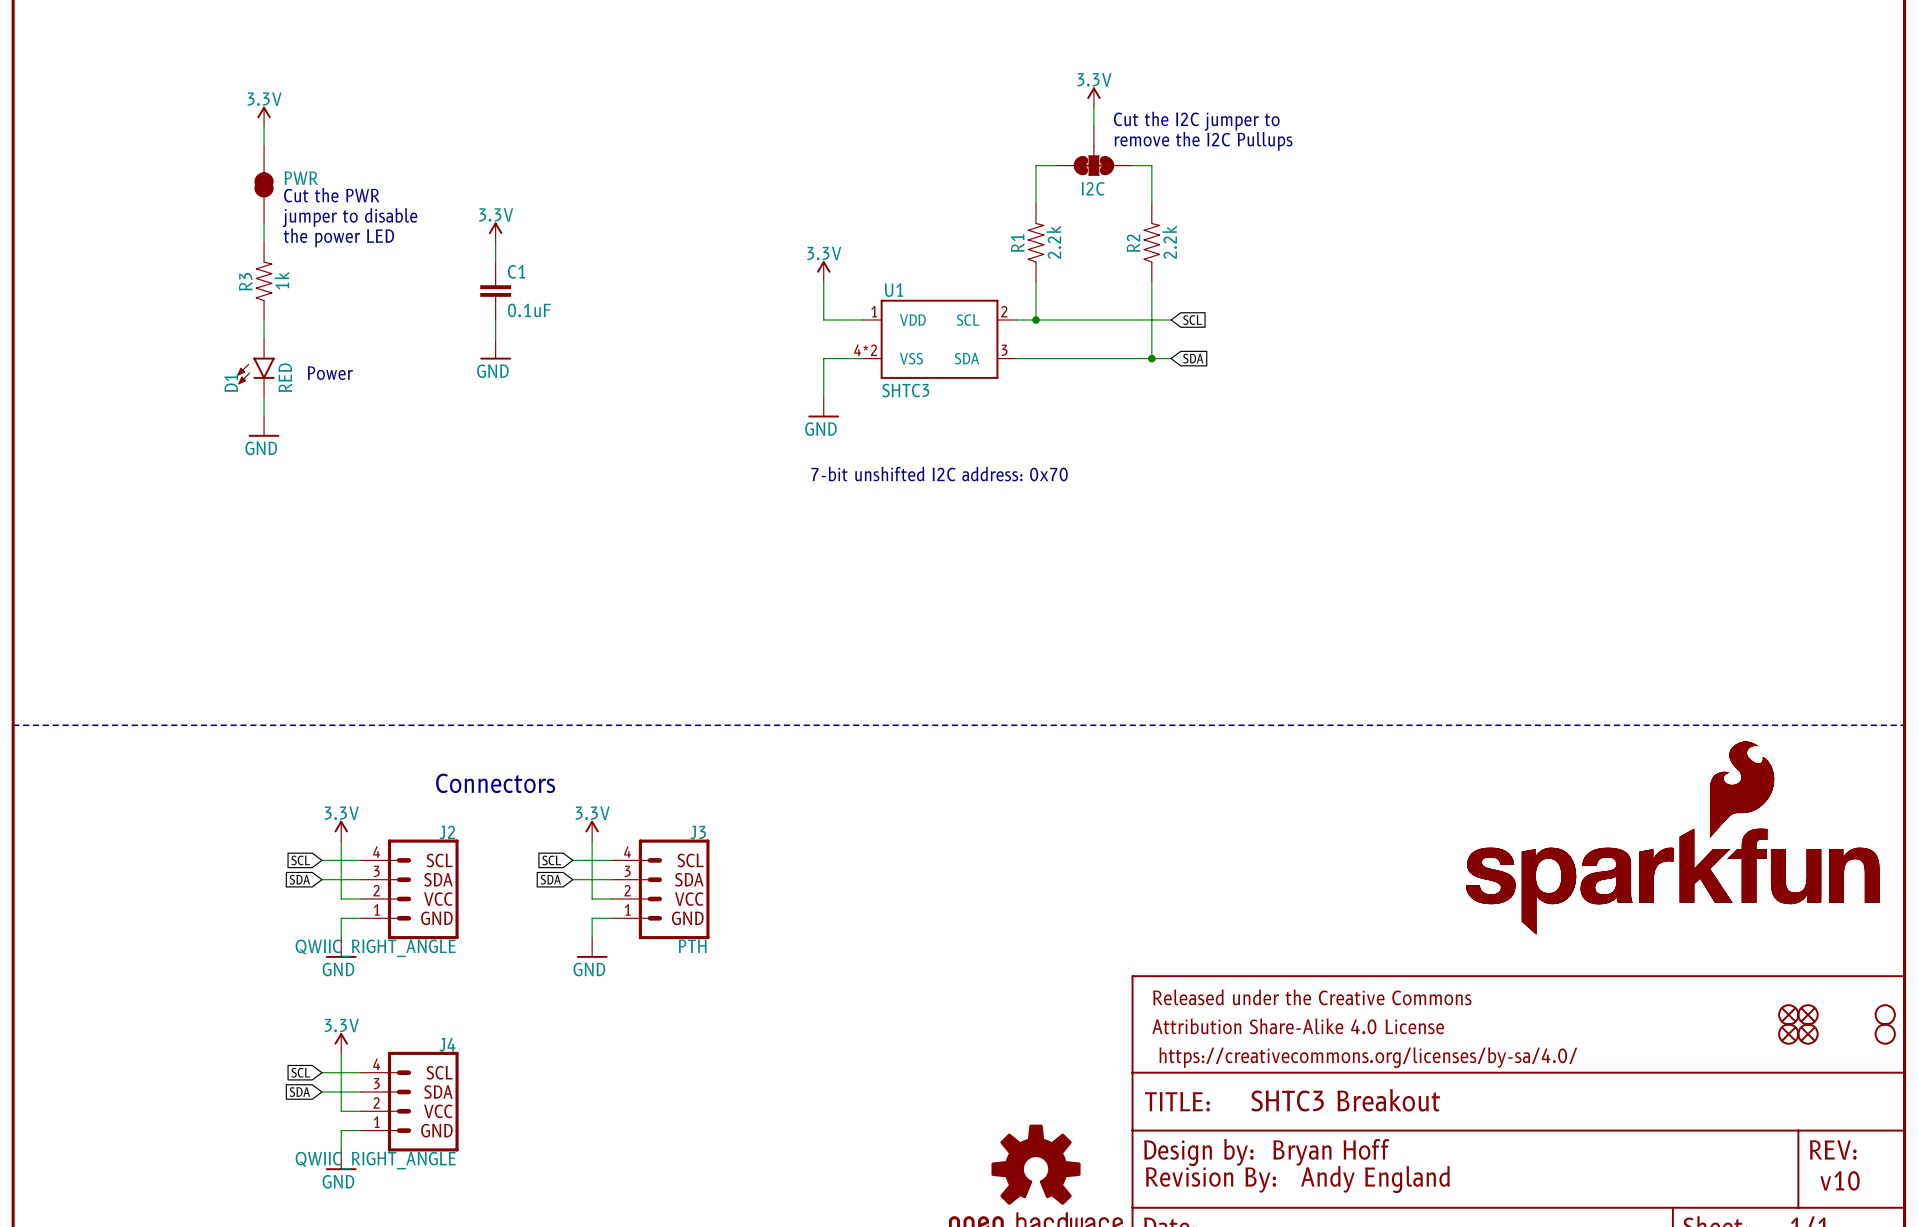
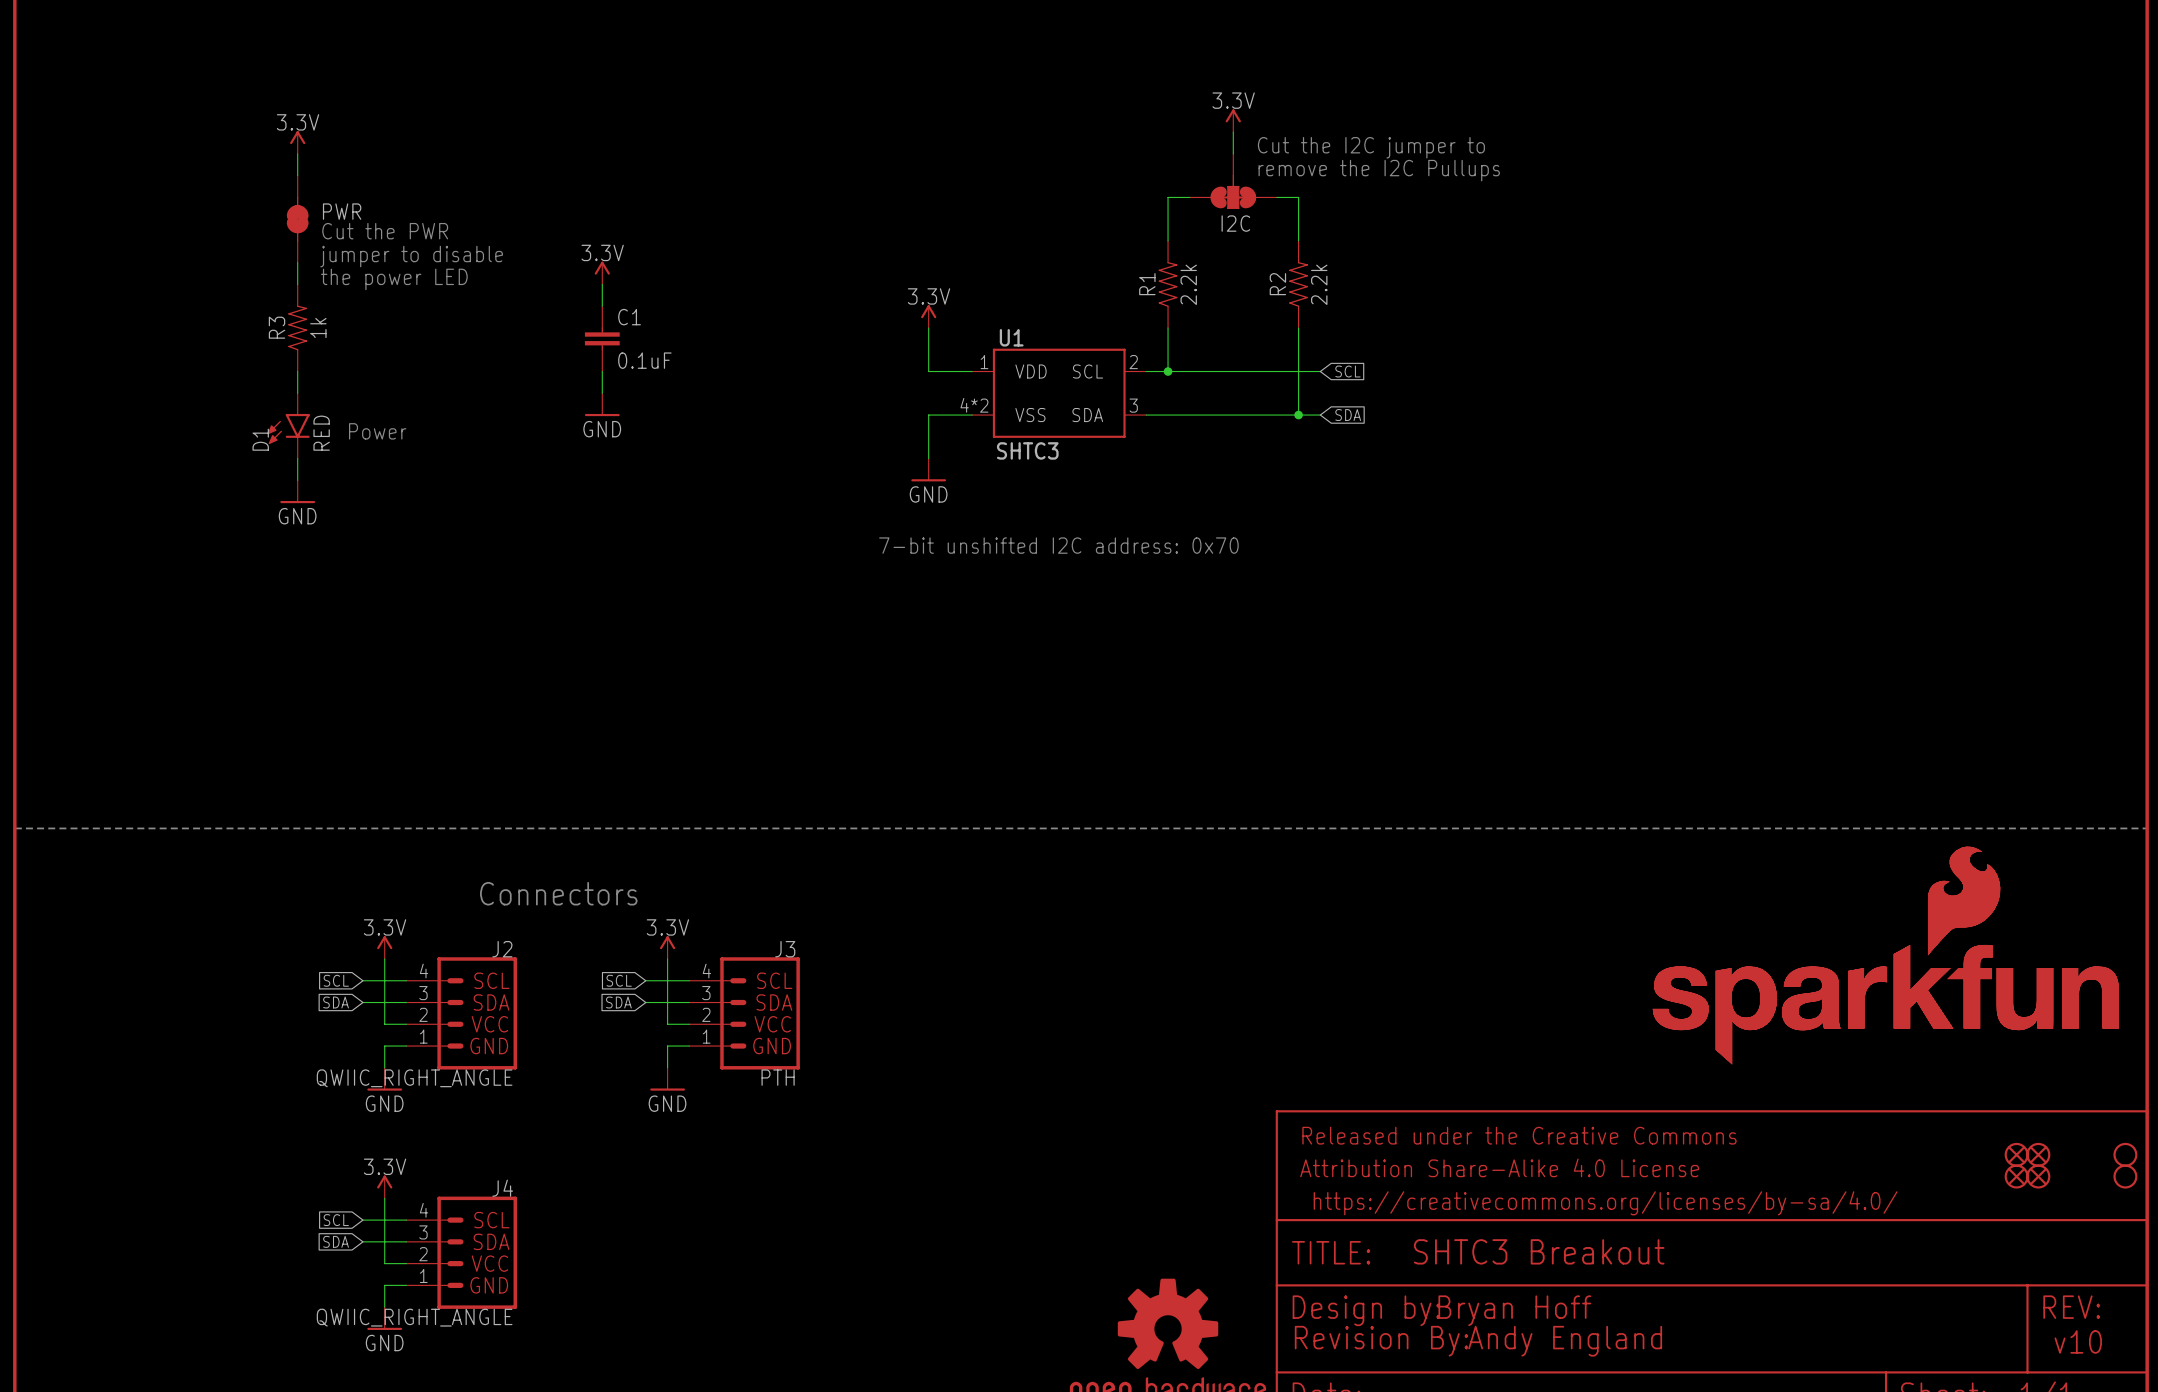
power symbol position: 3.3V (495, 232) -> 3.3V (602, 273)
wire: (495, 242) (495, 262) -> (602, 284) (602, 306)
C1 position: (495, 291) -> (602, 338)
wire: (495, 320) (495, 339) -> (602, 371) (602, 393)
power symbol position: GND (495, 349) -> GND (602, 404)

